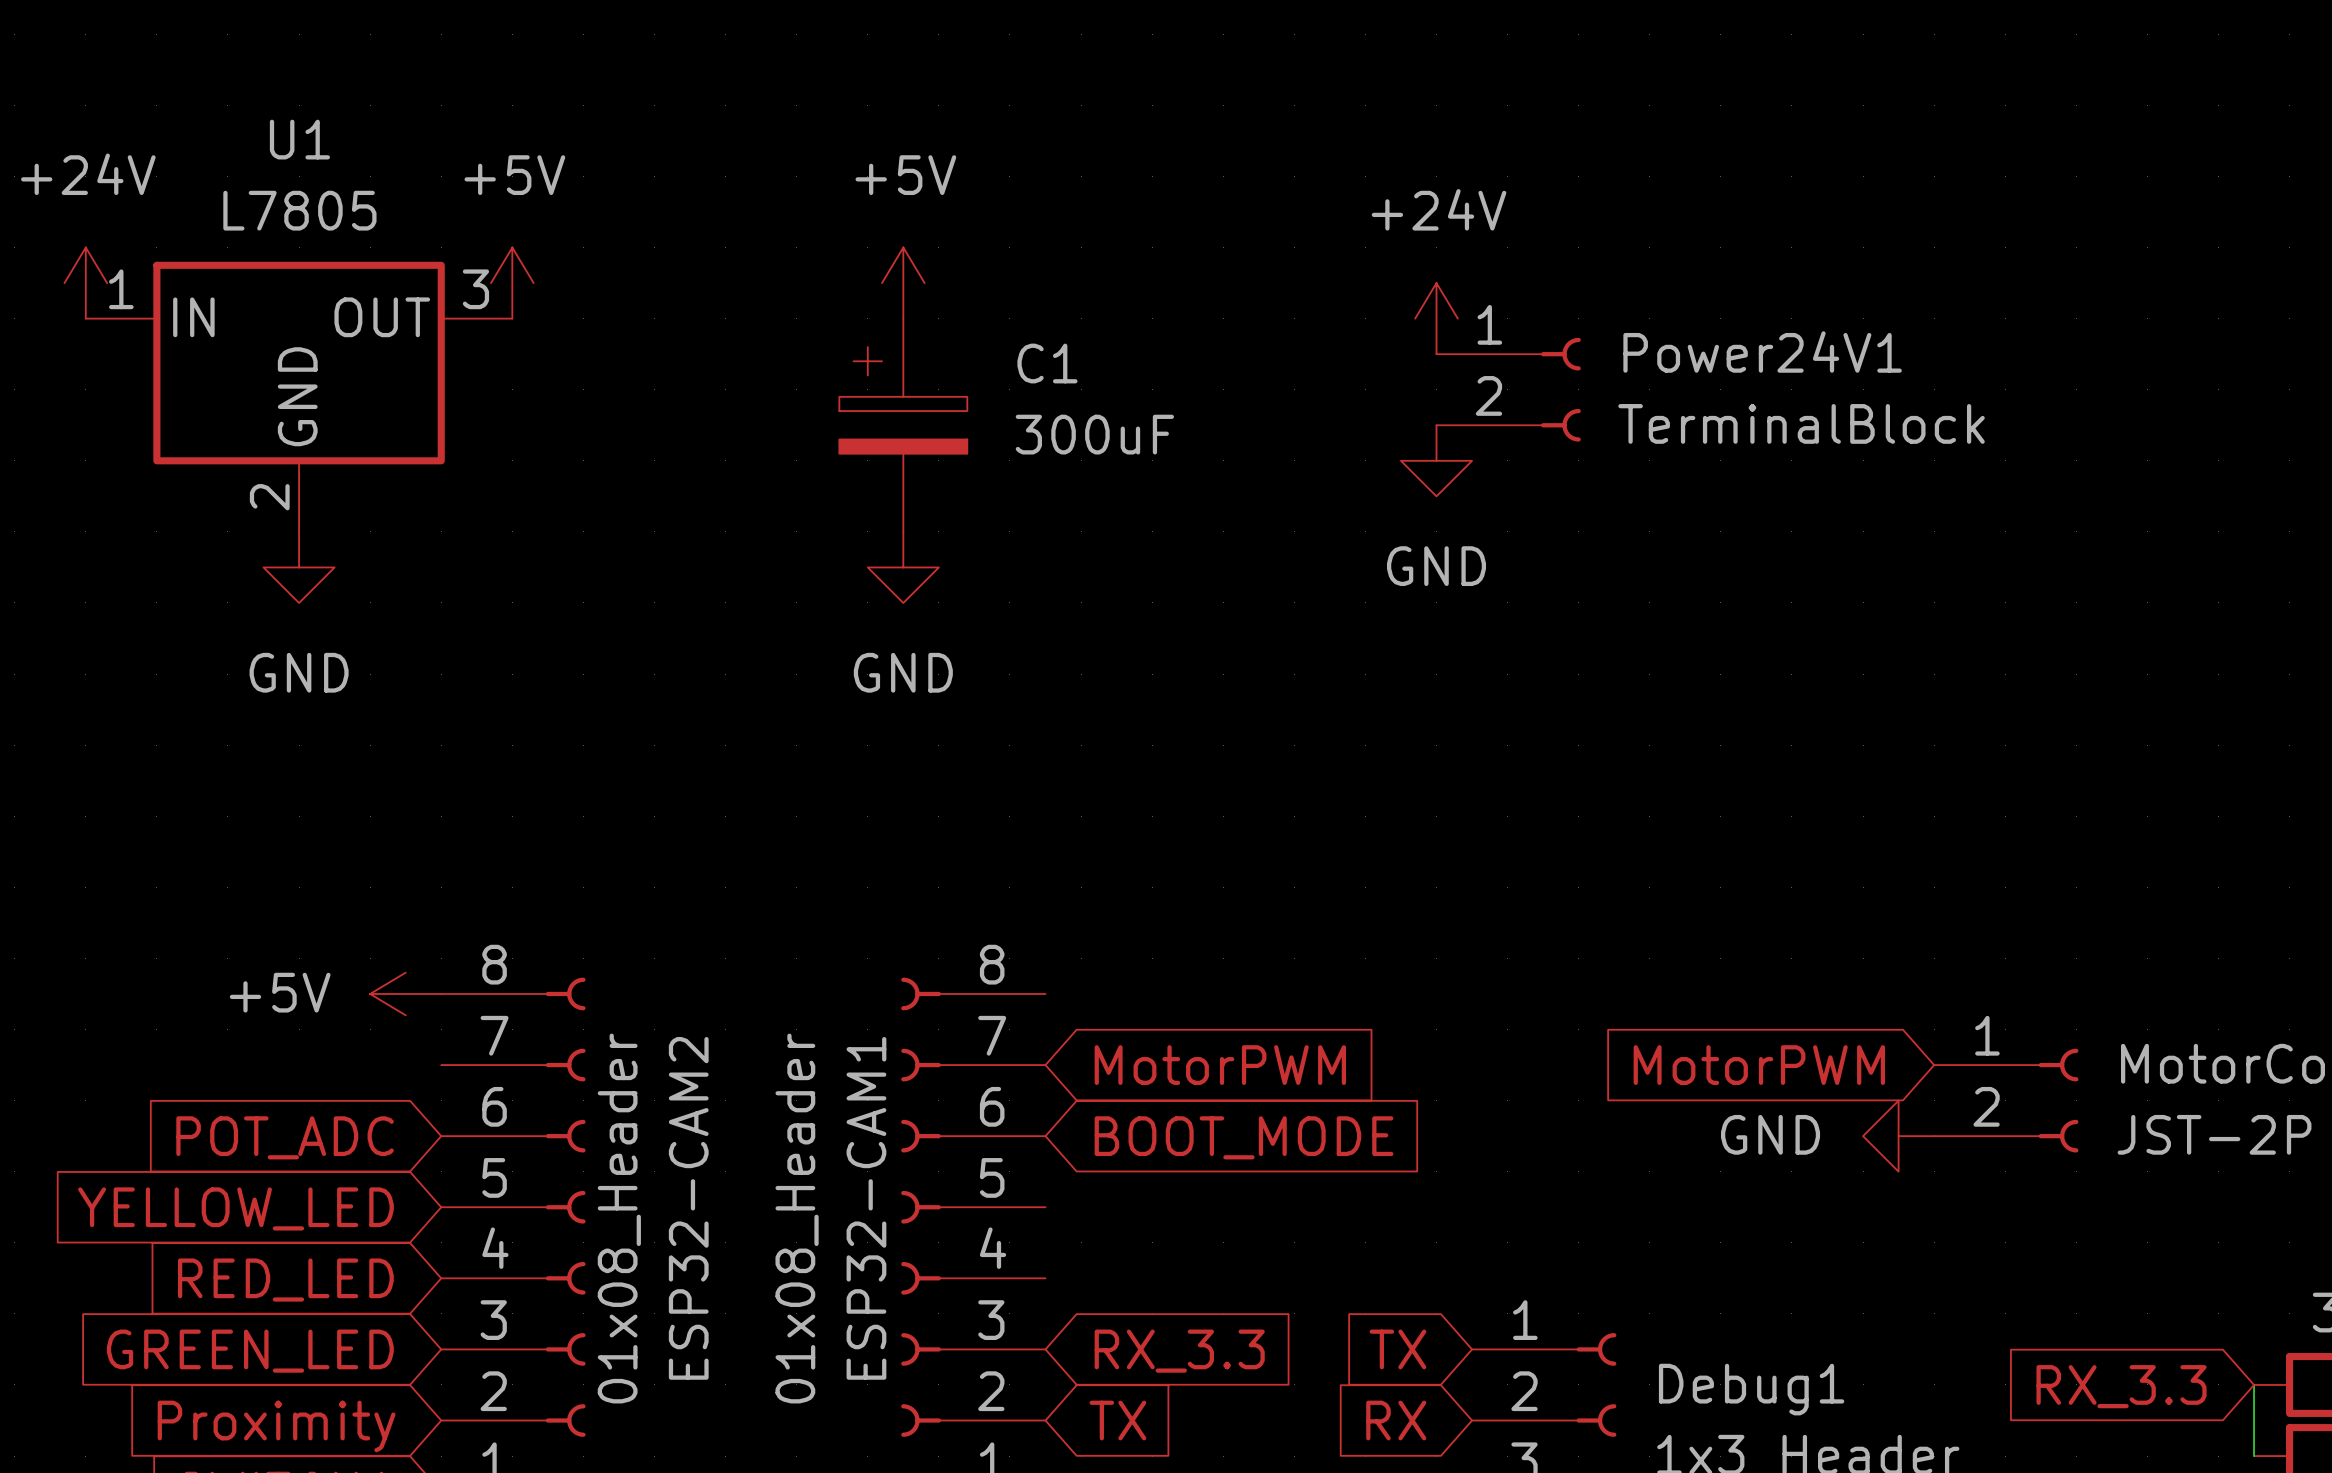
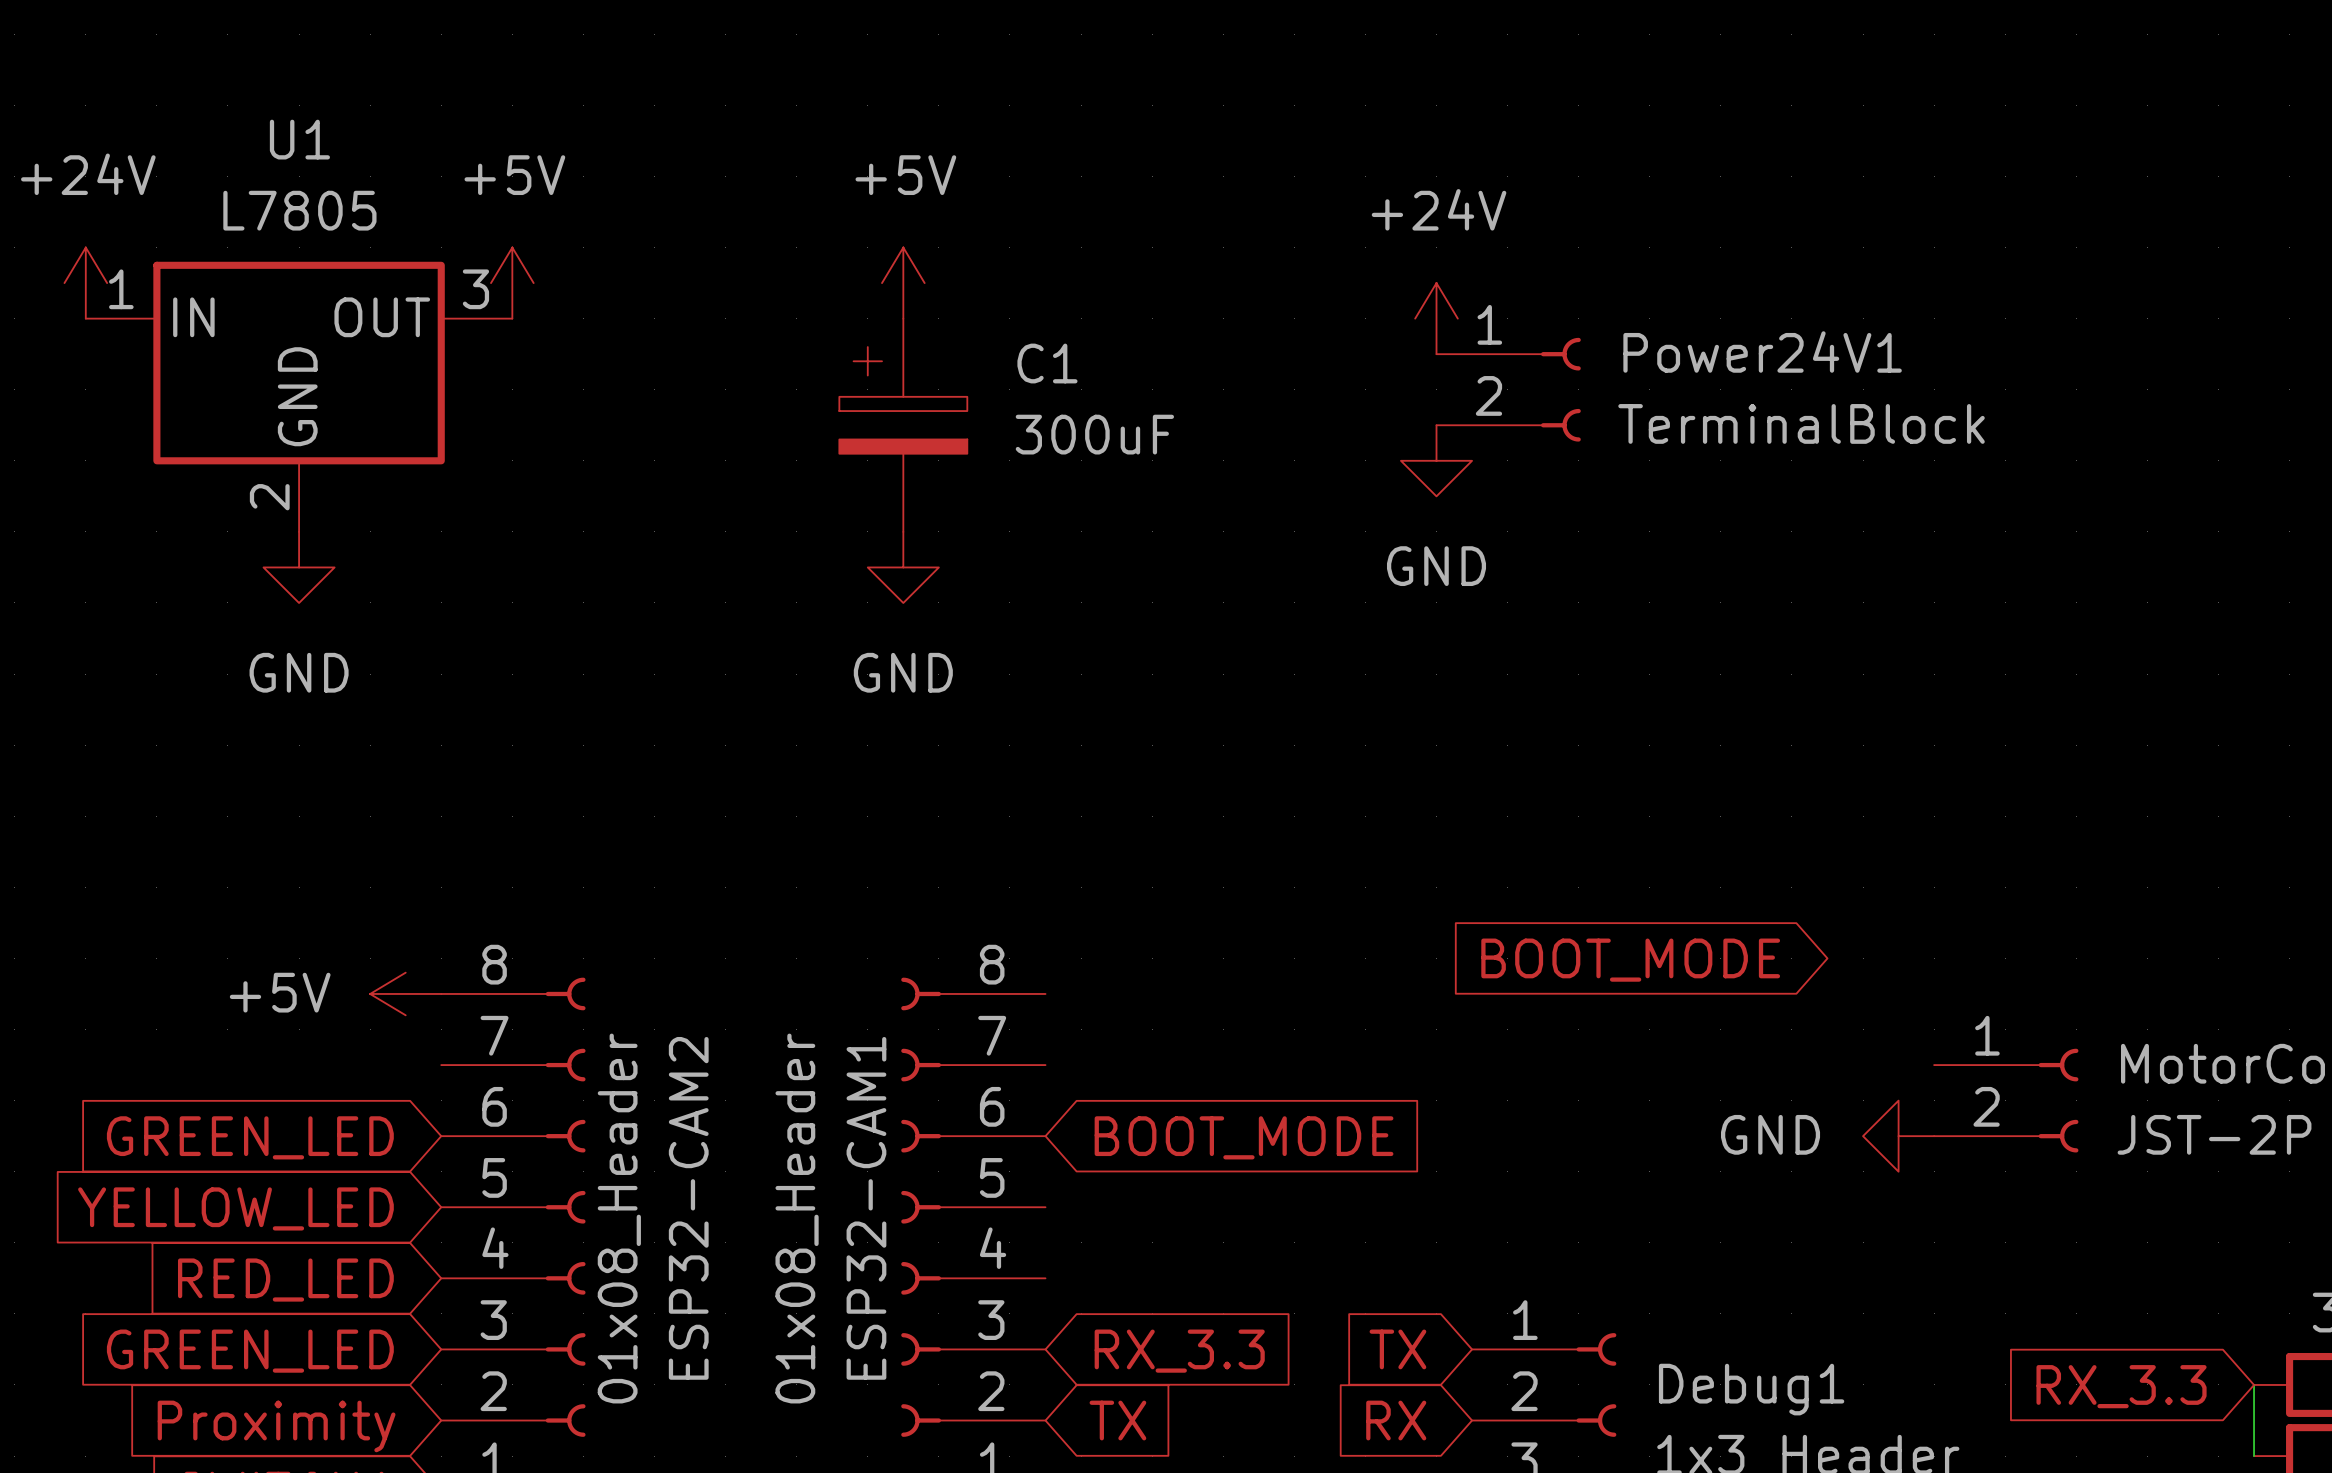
global label: none -> BOOT_MODE (1630, 960)
global label: MotorPWM (1220, 1065) -> none
global label: MotorPWM (1759, 1065) -> none
global label: POT_ADC (285, 1137) -> GREEN_LED (250, 1137)

